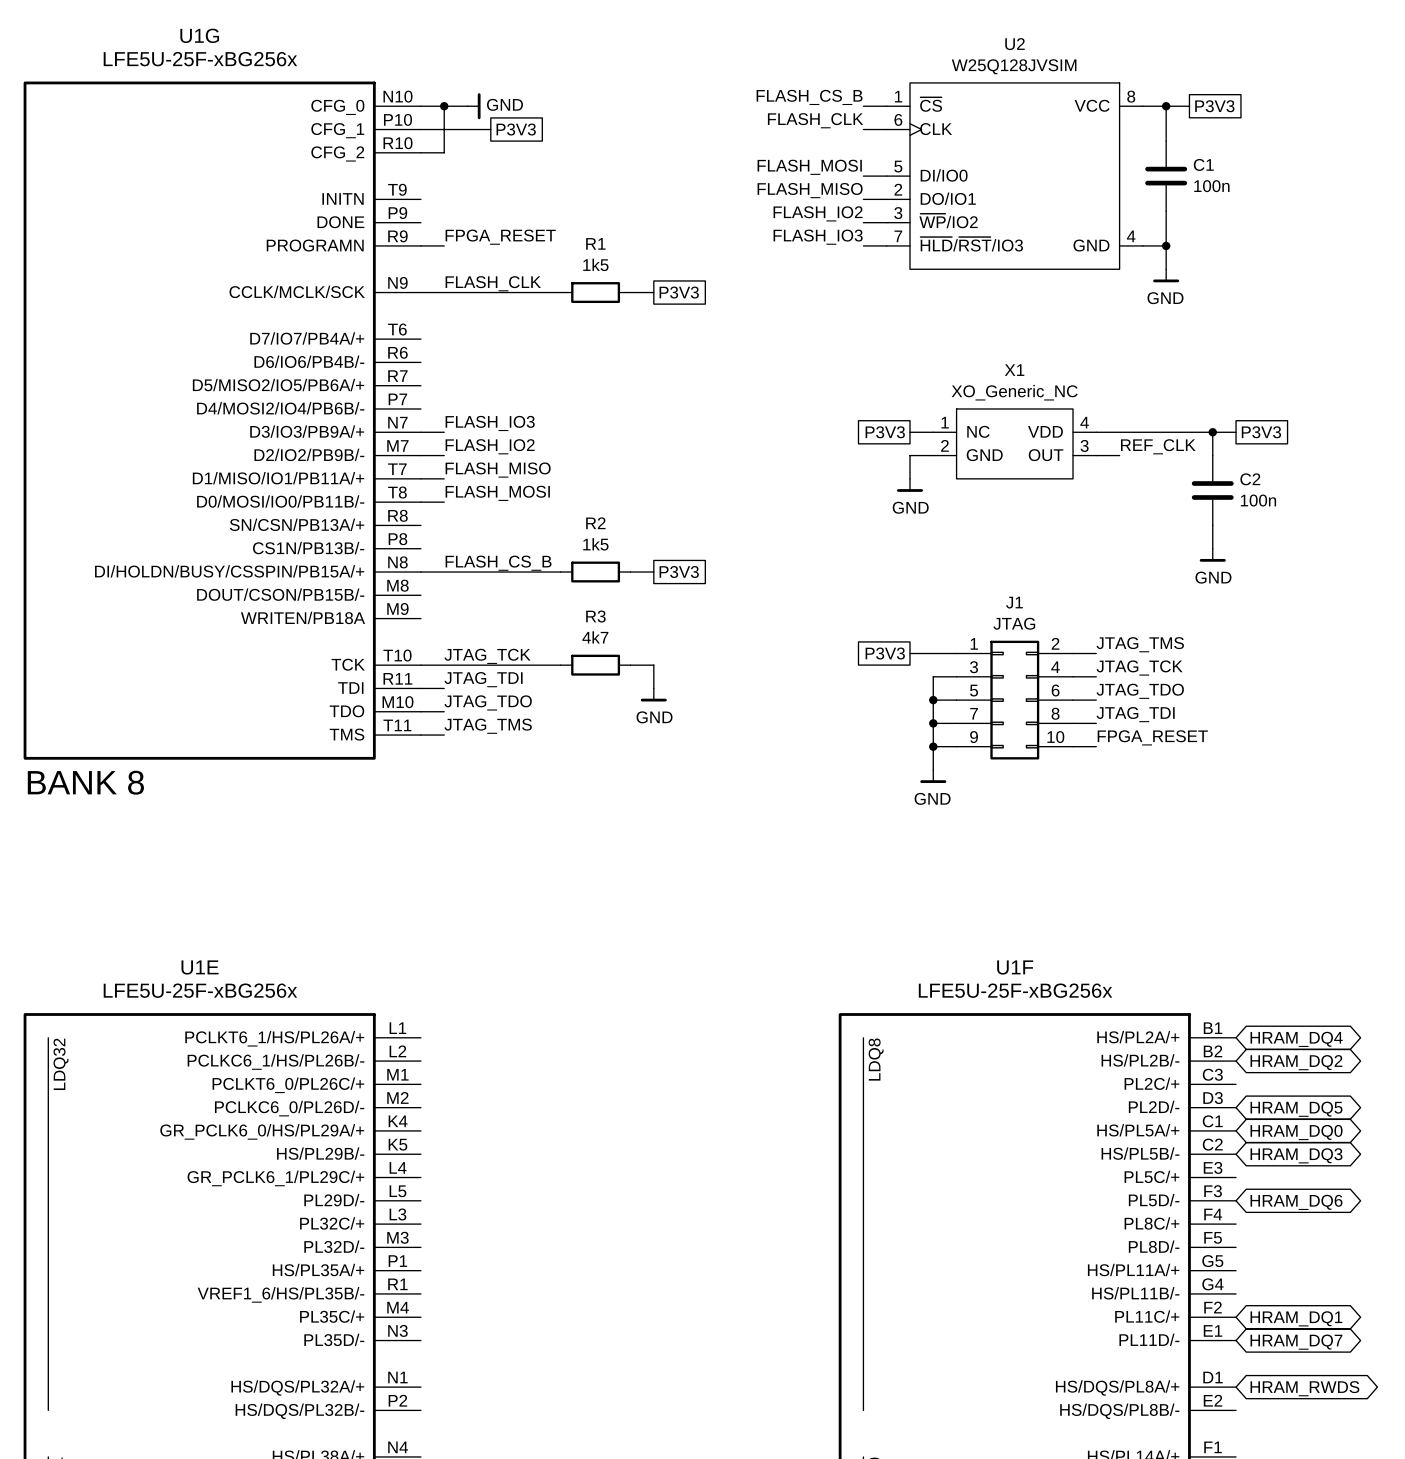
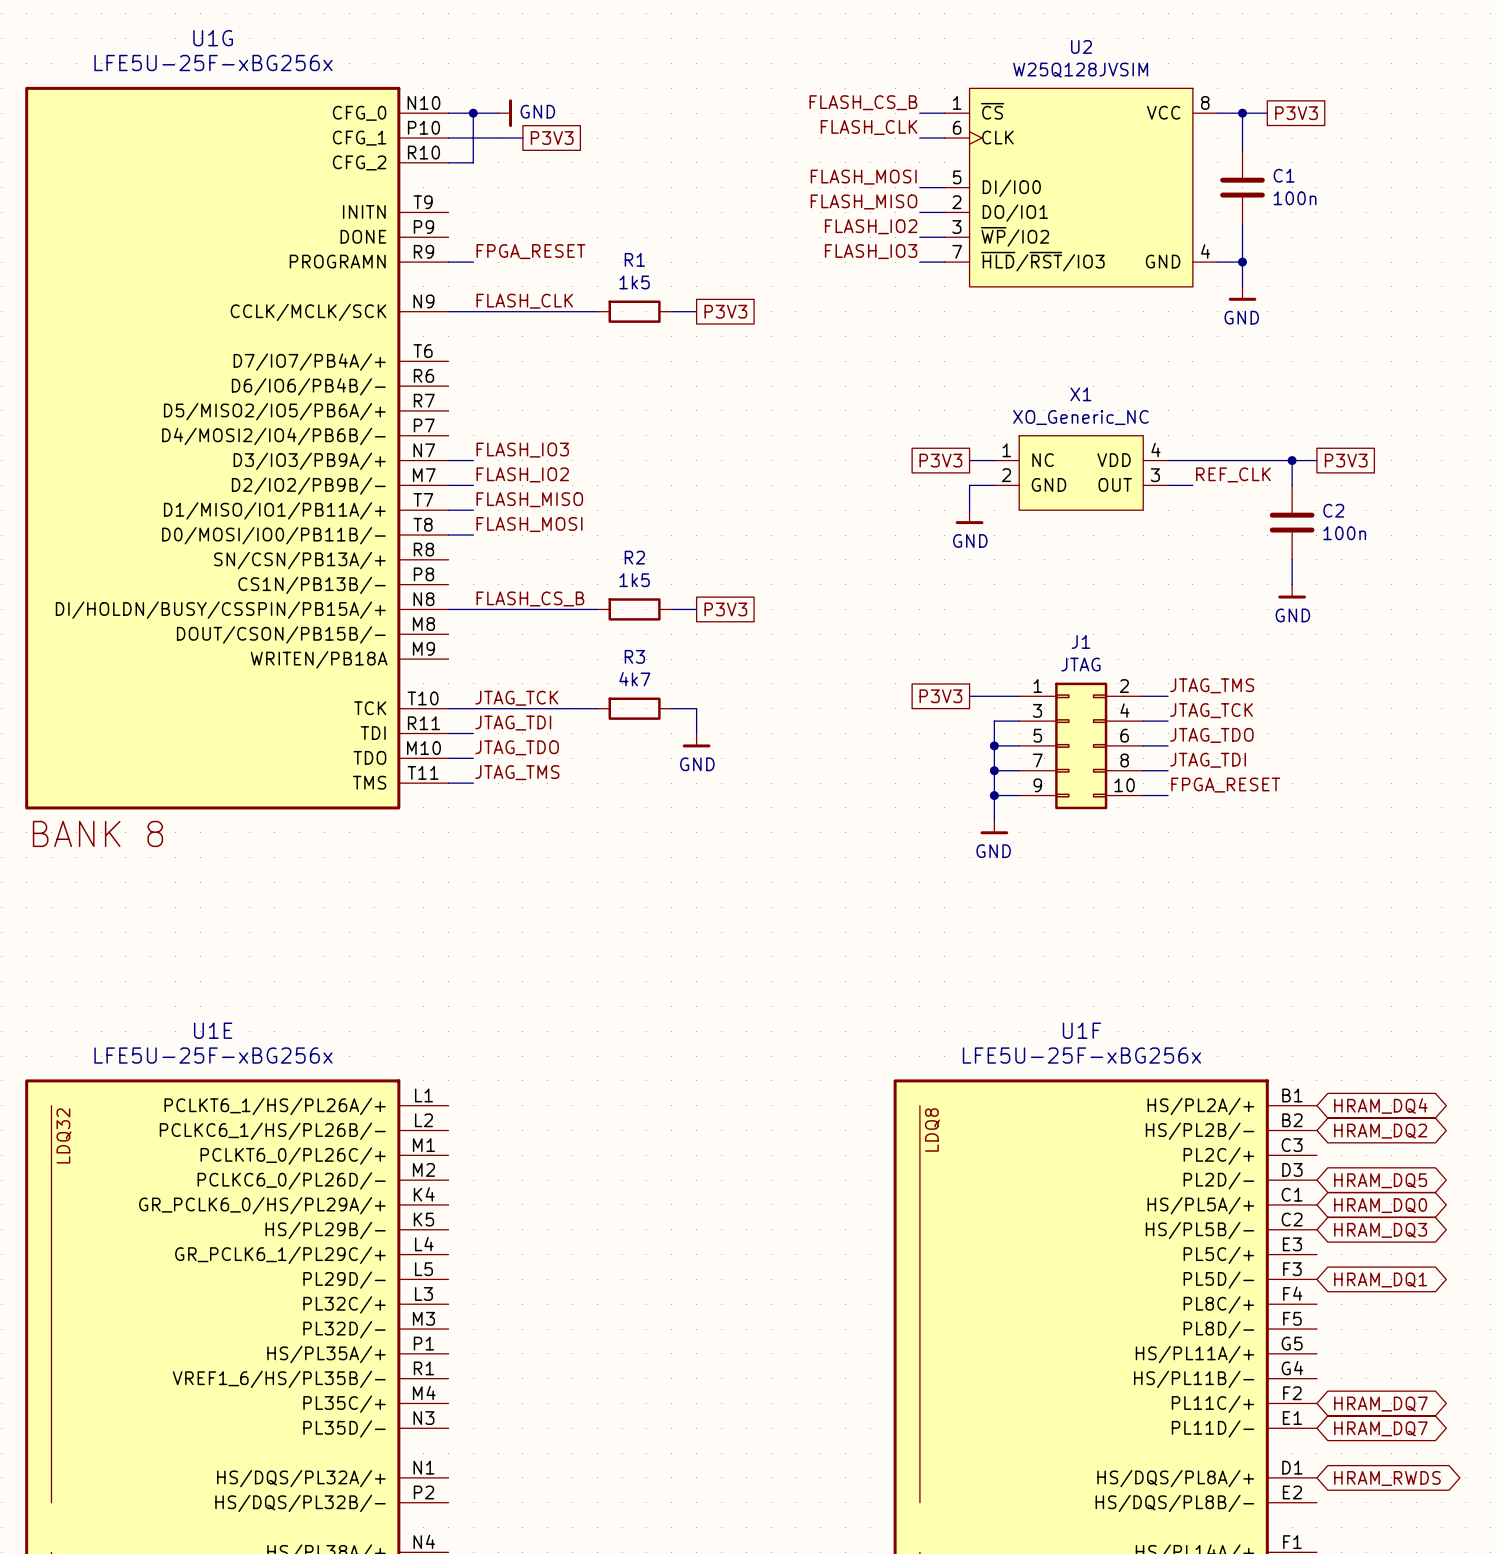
global label: HRAM_DQ6 (1296, 1202) -> HRAM_DQ1 (1380, 1279)
global label: HRAM_DQ1 (1296, 1318) -> HRAM_DQ7 (1380, 1404)

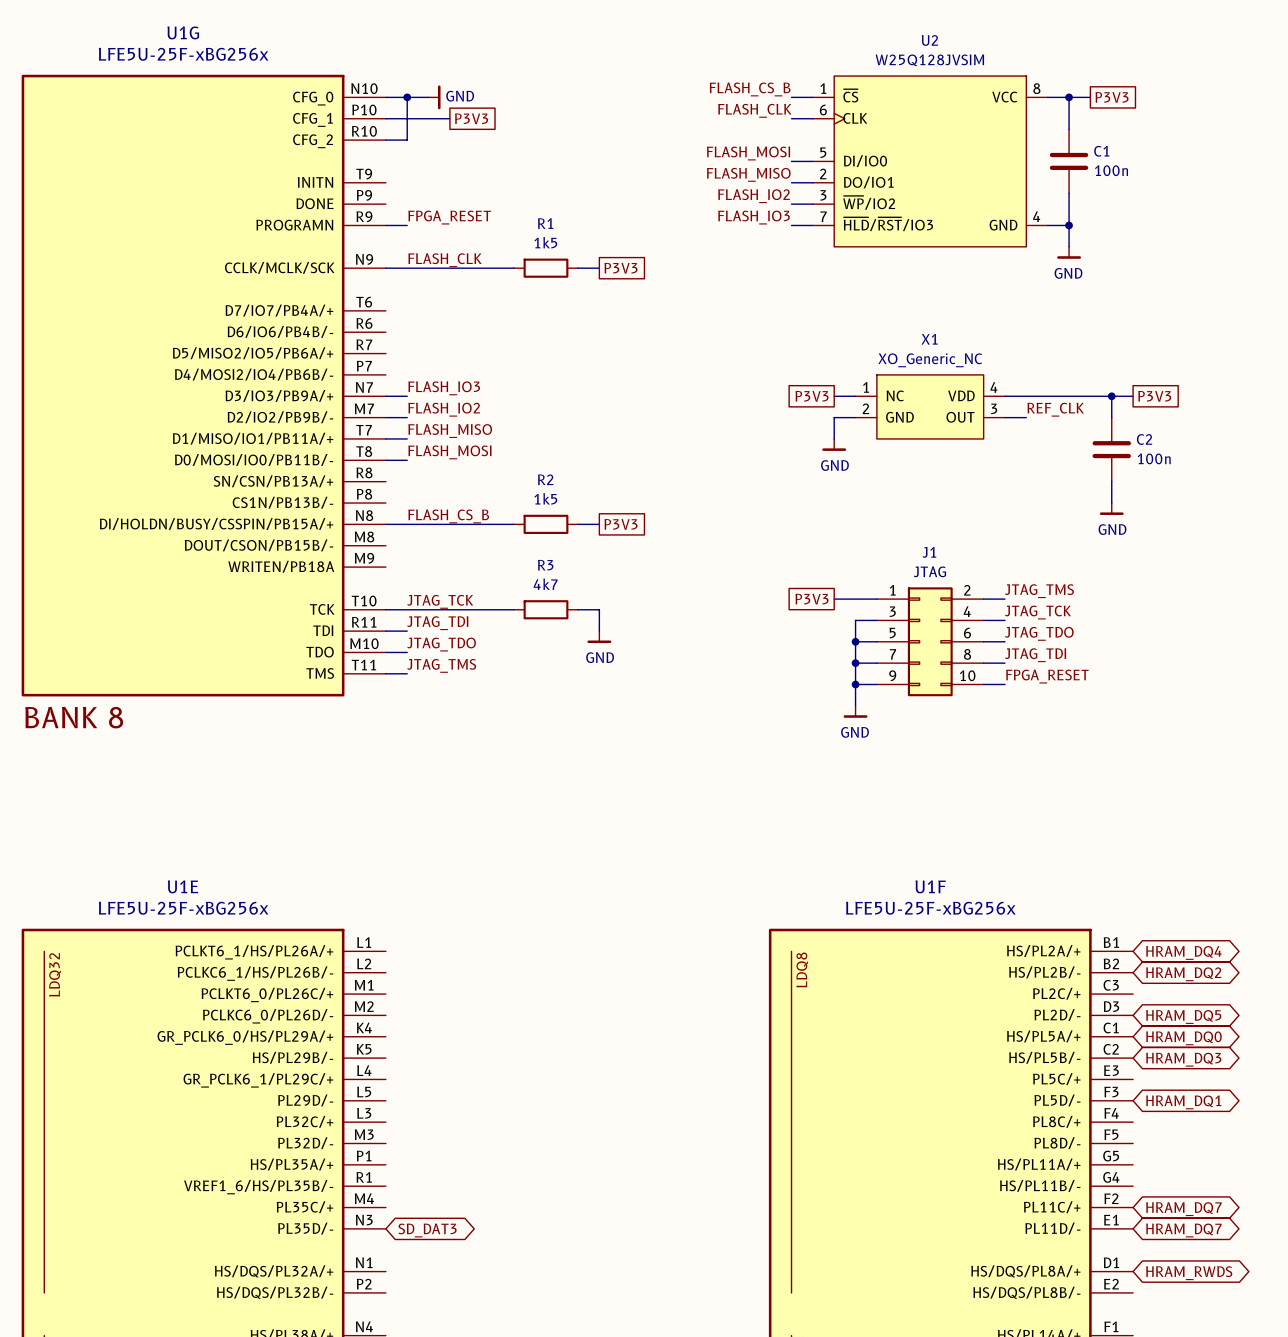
global label: none -> SD_DAT3 (427, 1230)

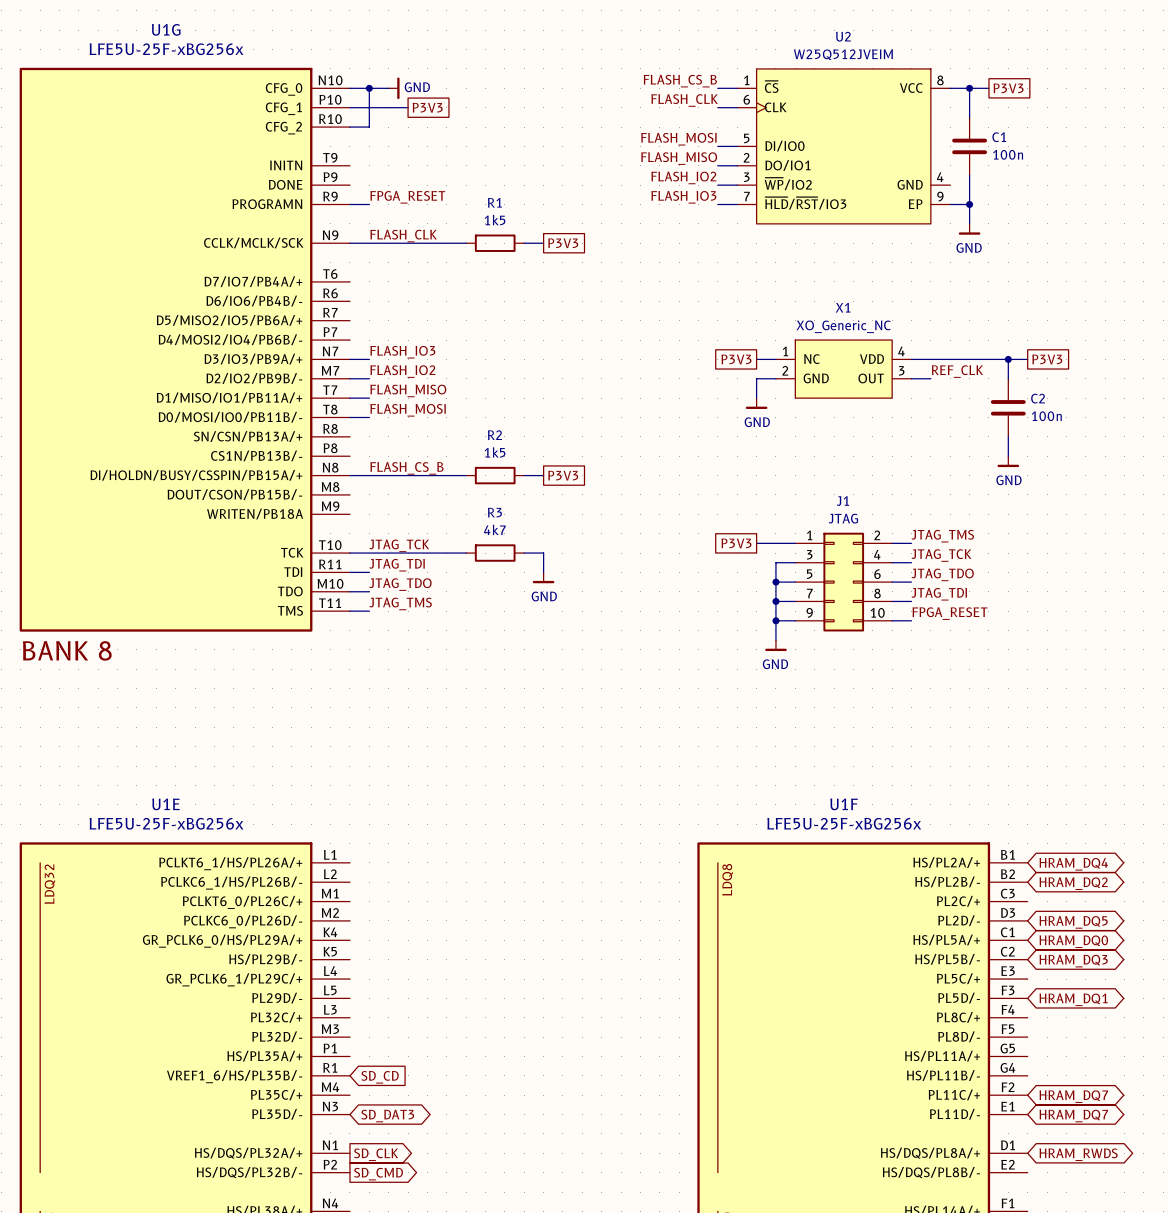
U2 value: W25Q128JVSIM (929, 60) -> W25Q512JVEIM (843, 54)
U2 symbol: [812, 76, 1048, 247] -> [737, 68, 951, 224]
global label: none -> SD_CD (380, 1077)
global label: none -> SD_CLK (376, 1154)
global label: none -> SD_CMD (378, 1174)

